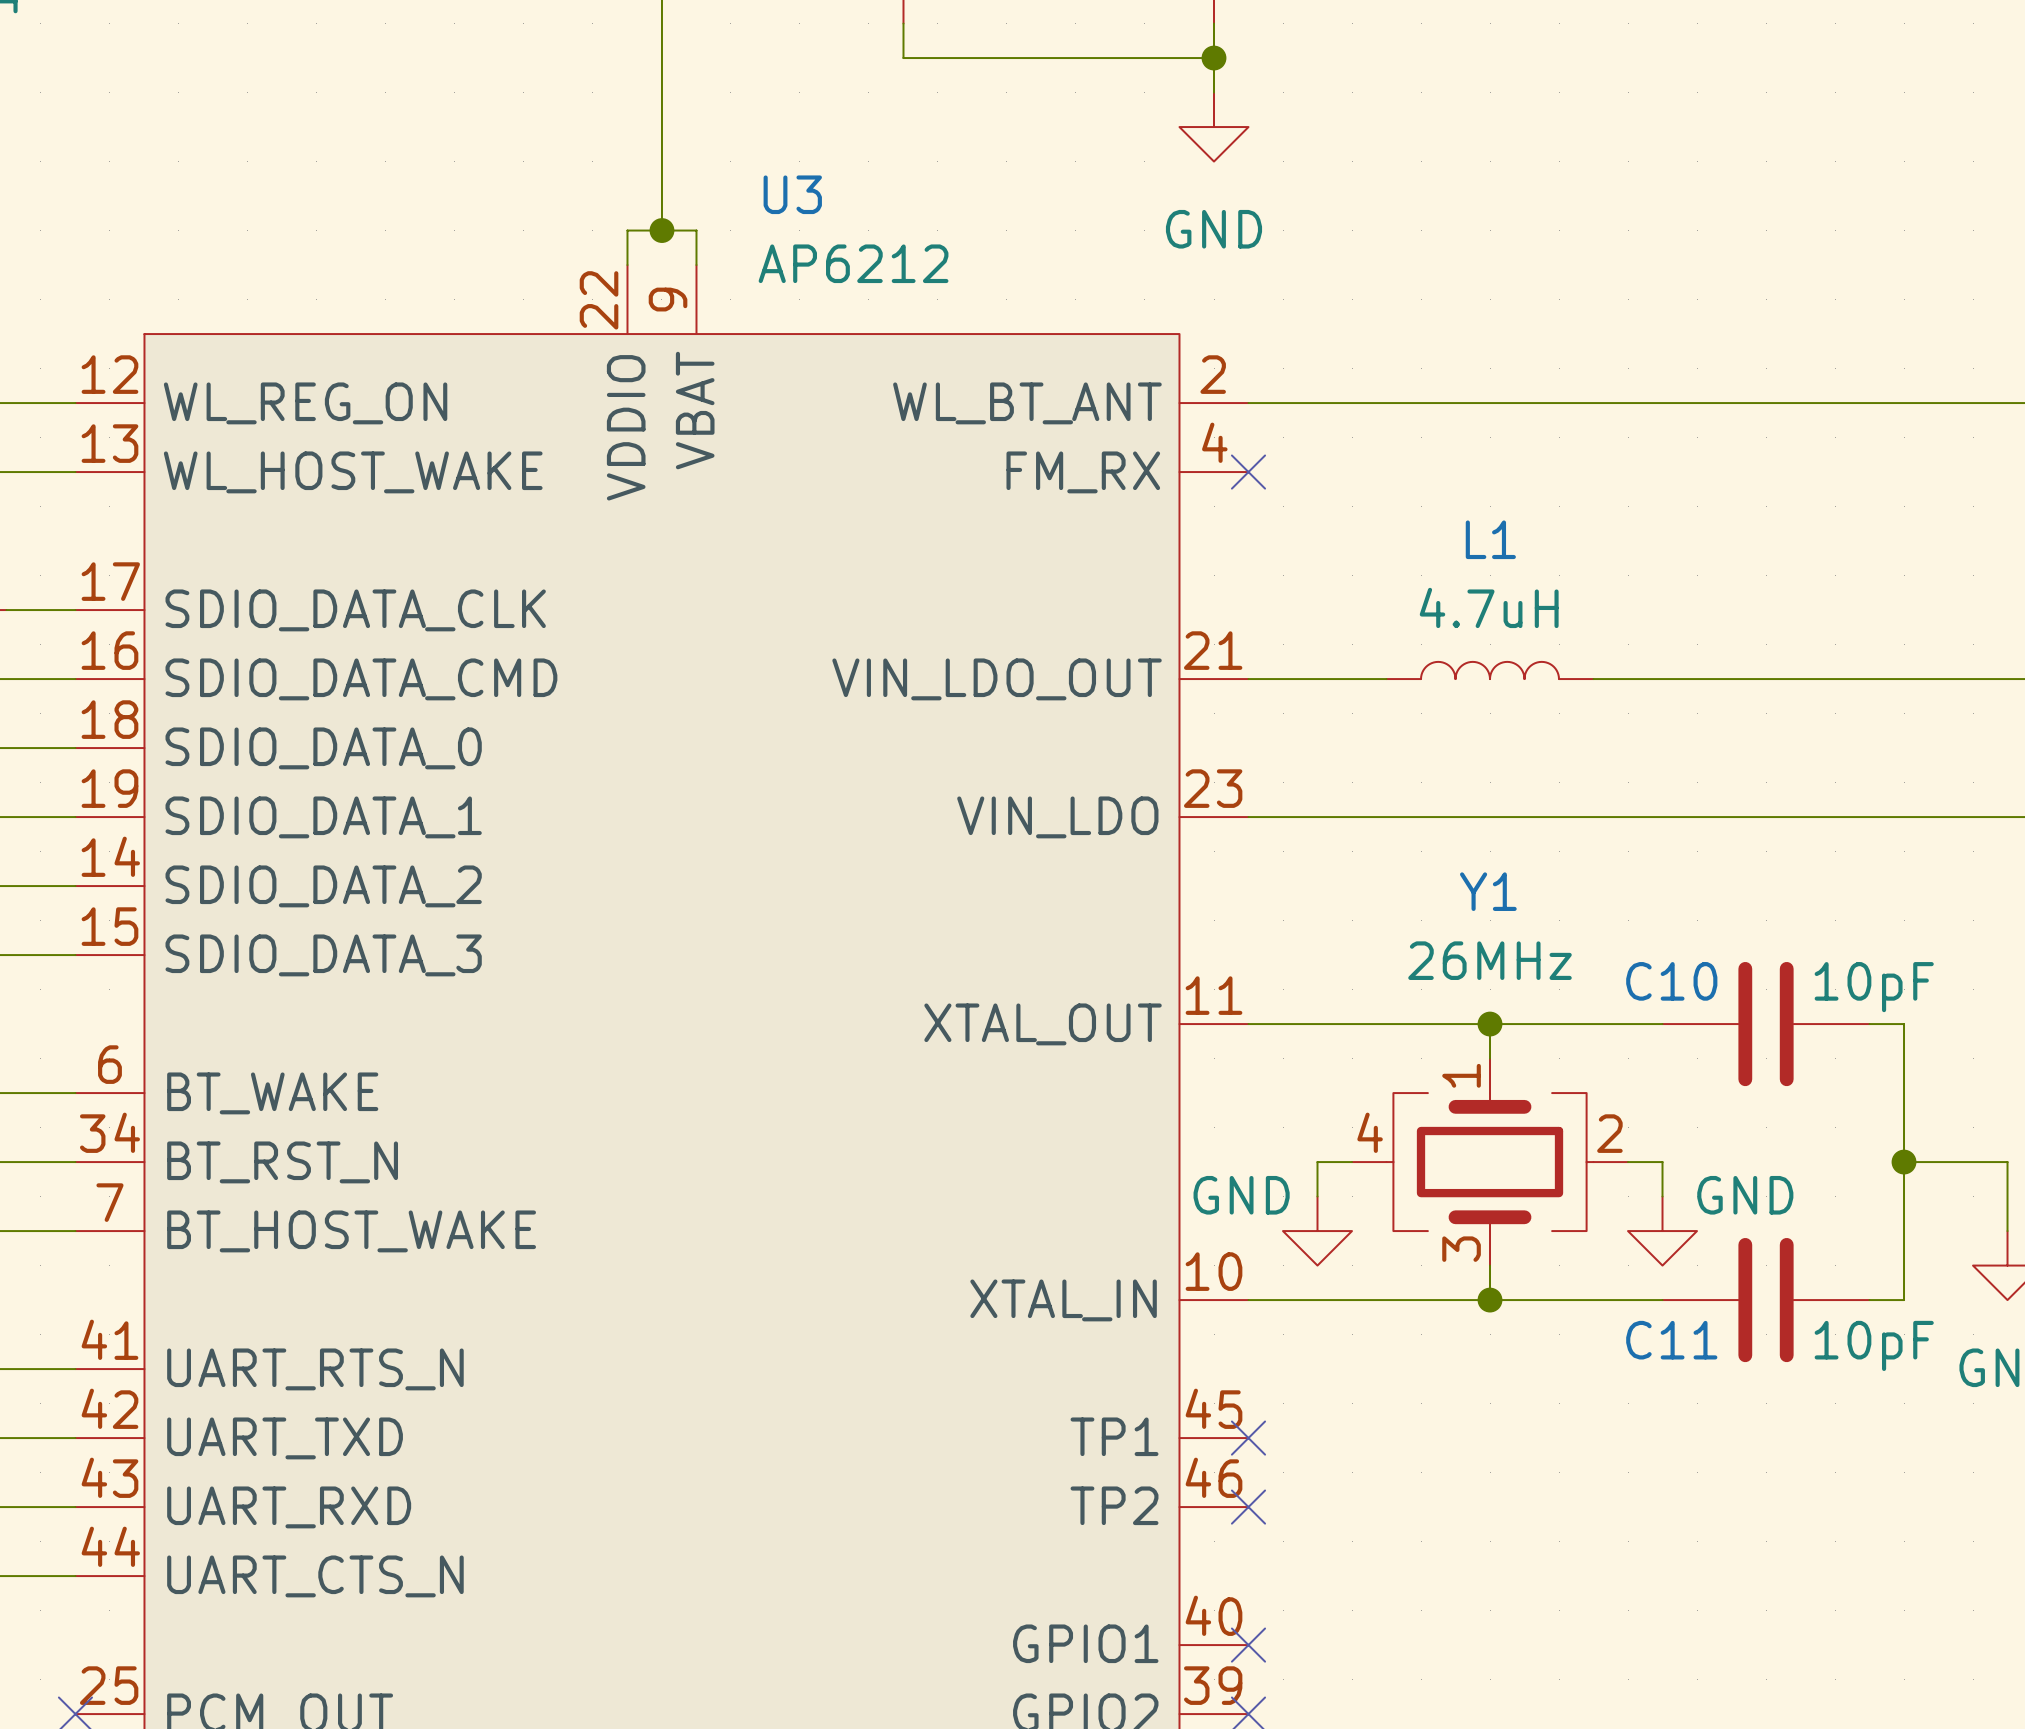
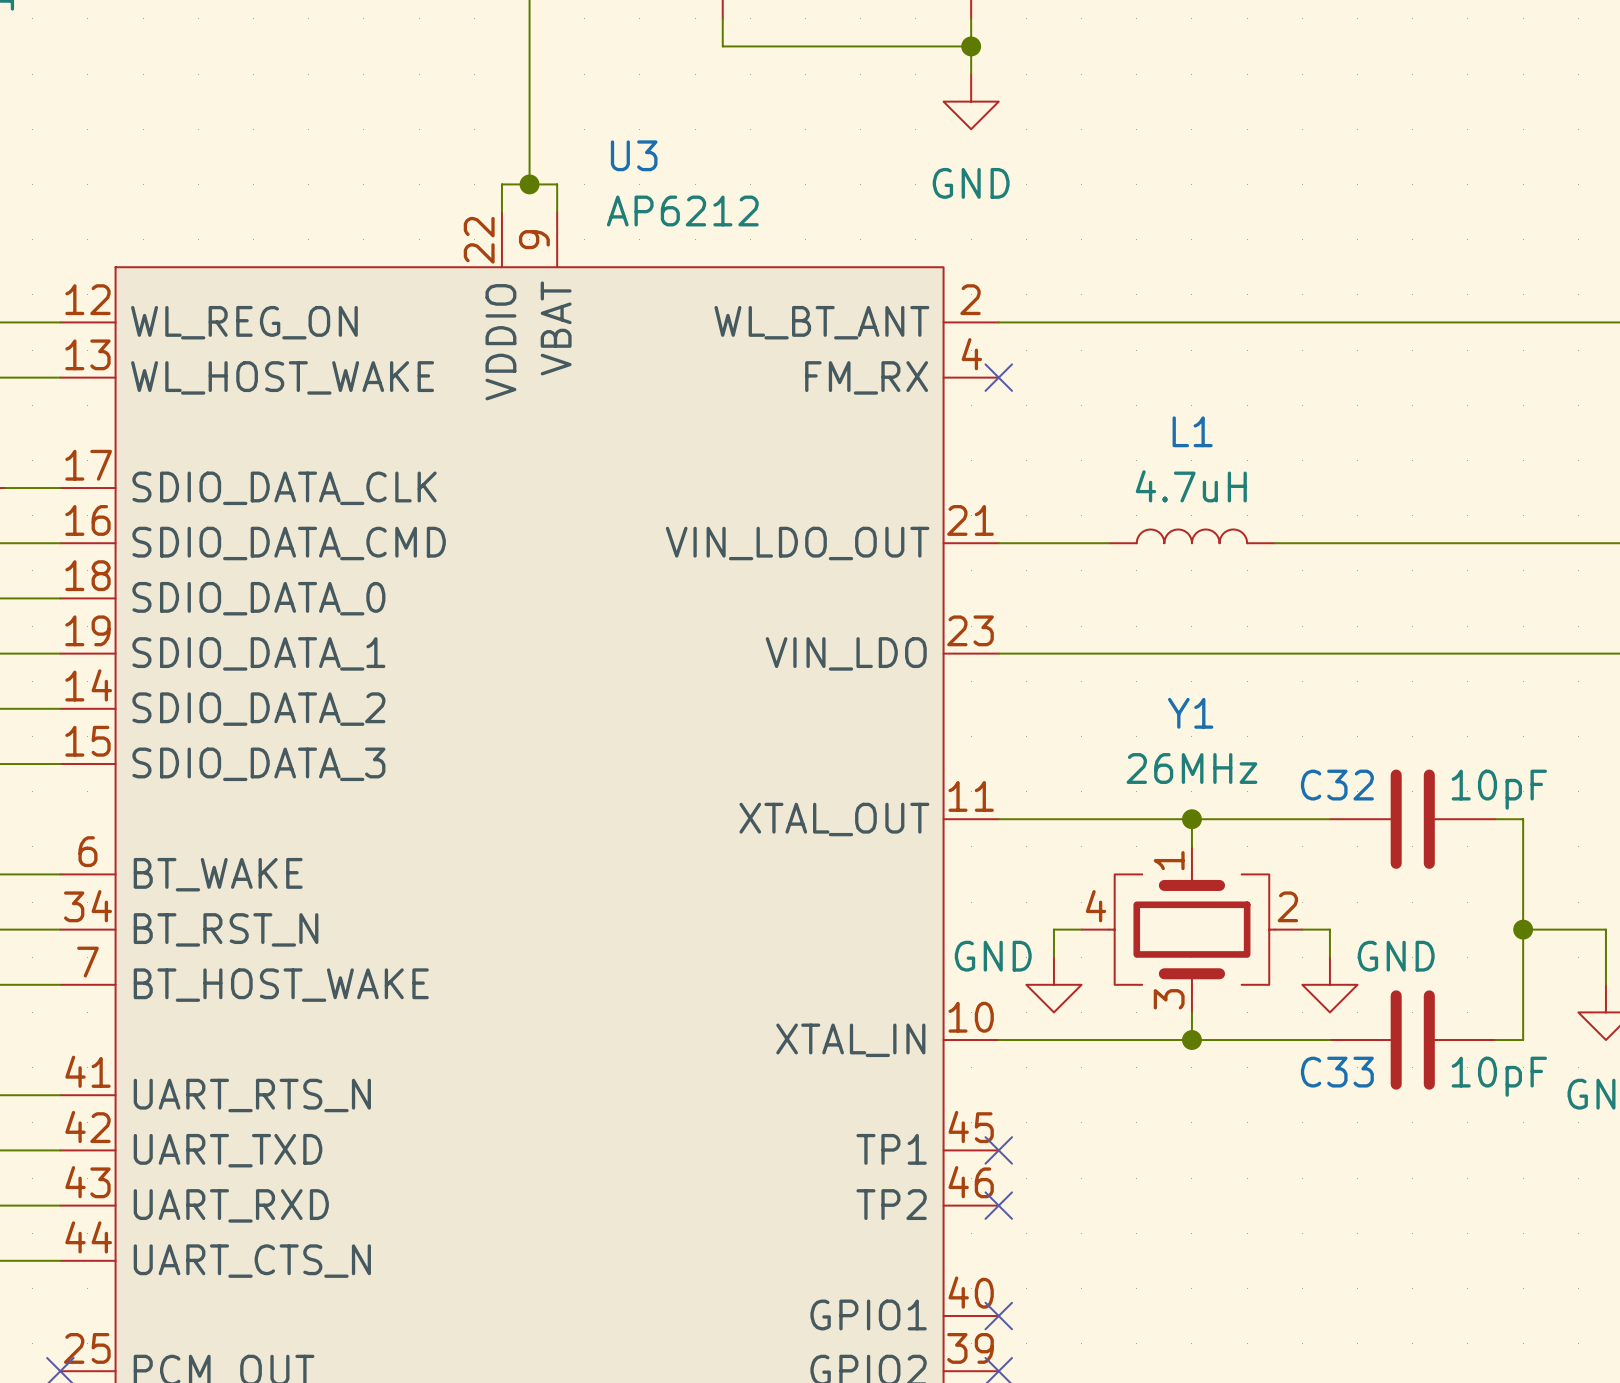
C10 name: C10 (1671, 981) -> C32 (1337, 785)
C11 name: C11 (1671, 1340) -> C33 (1337, 1072)

